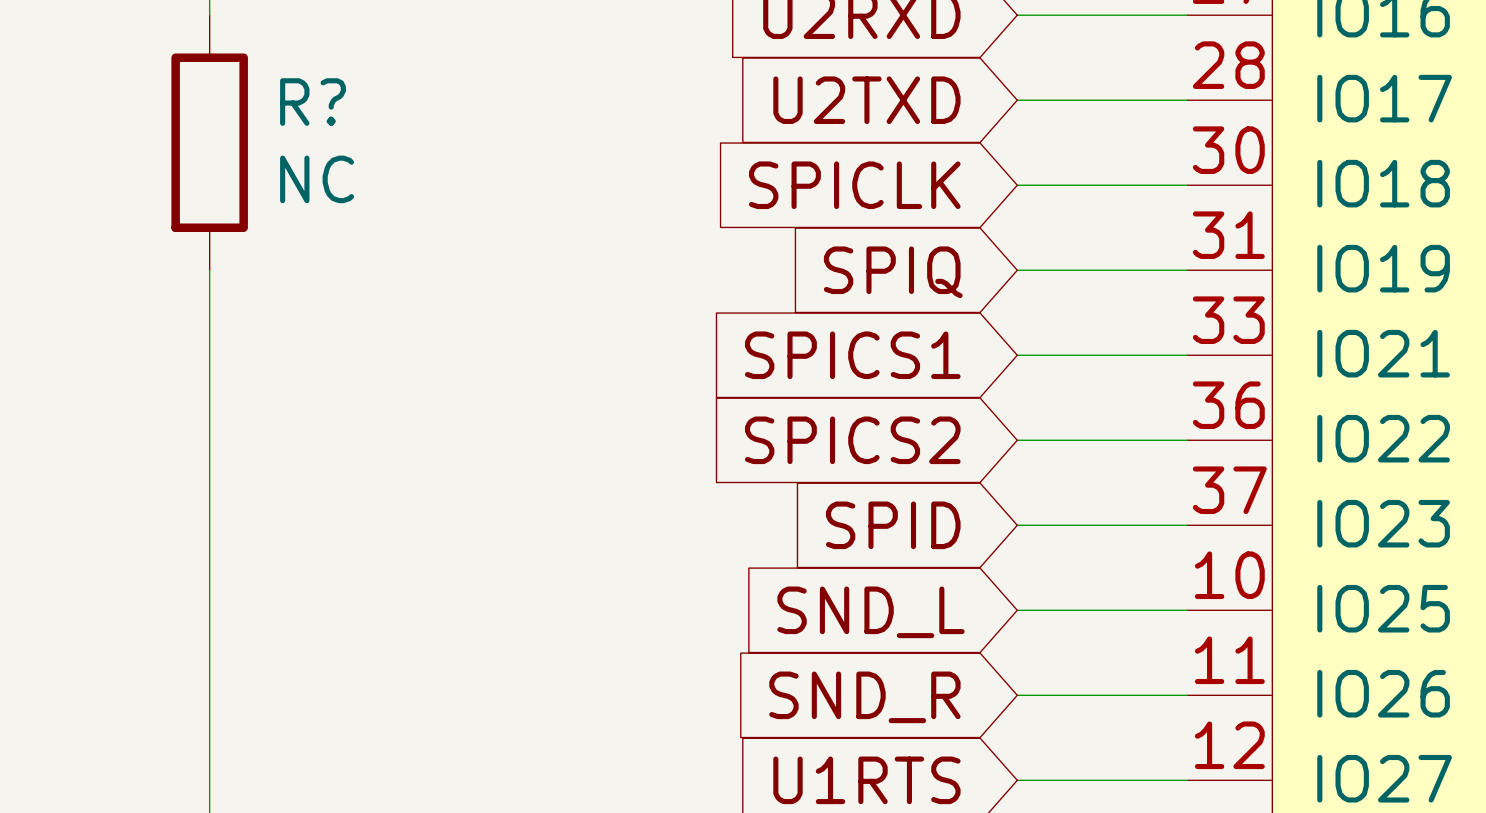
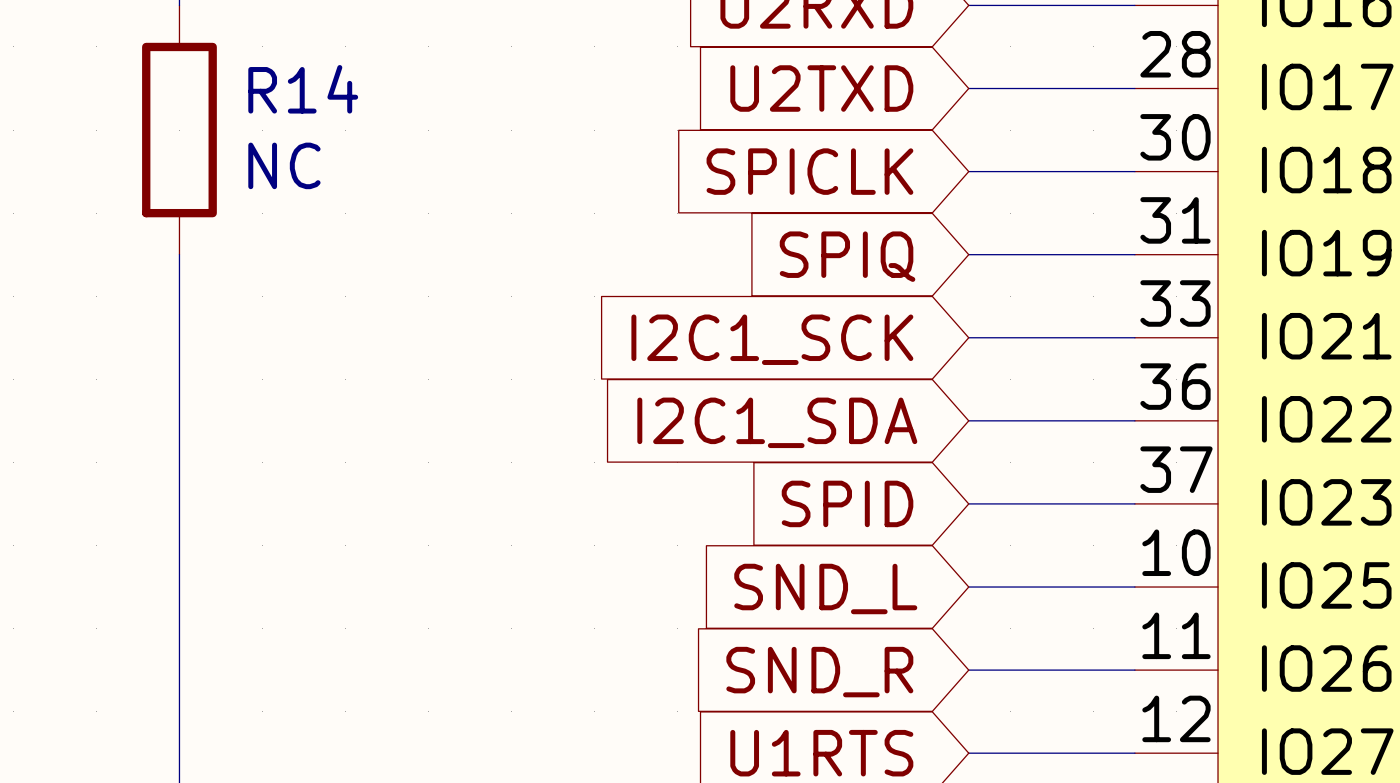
R? name: R? (313, 102) -> R14 (303, 89)
global label: SPICS1 (852, 355) -> I2C1_SCK (772, 339)
global label: SPICS2 (852, 440) -> I2C1_SDA (777, 422)

